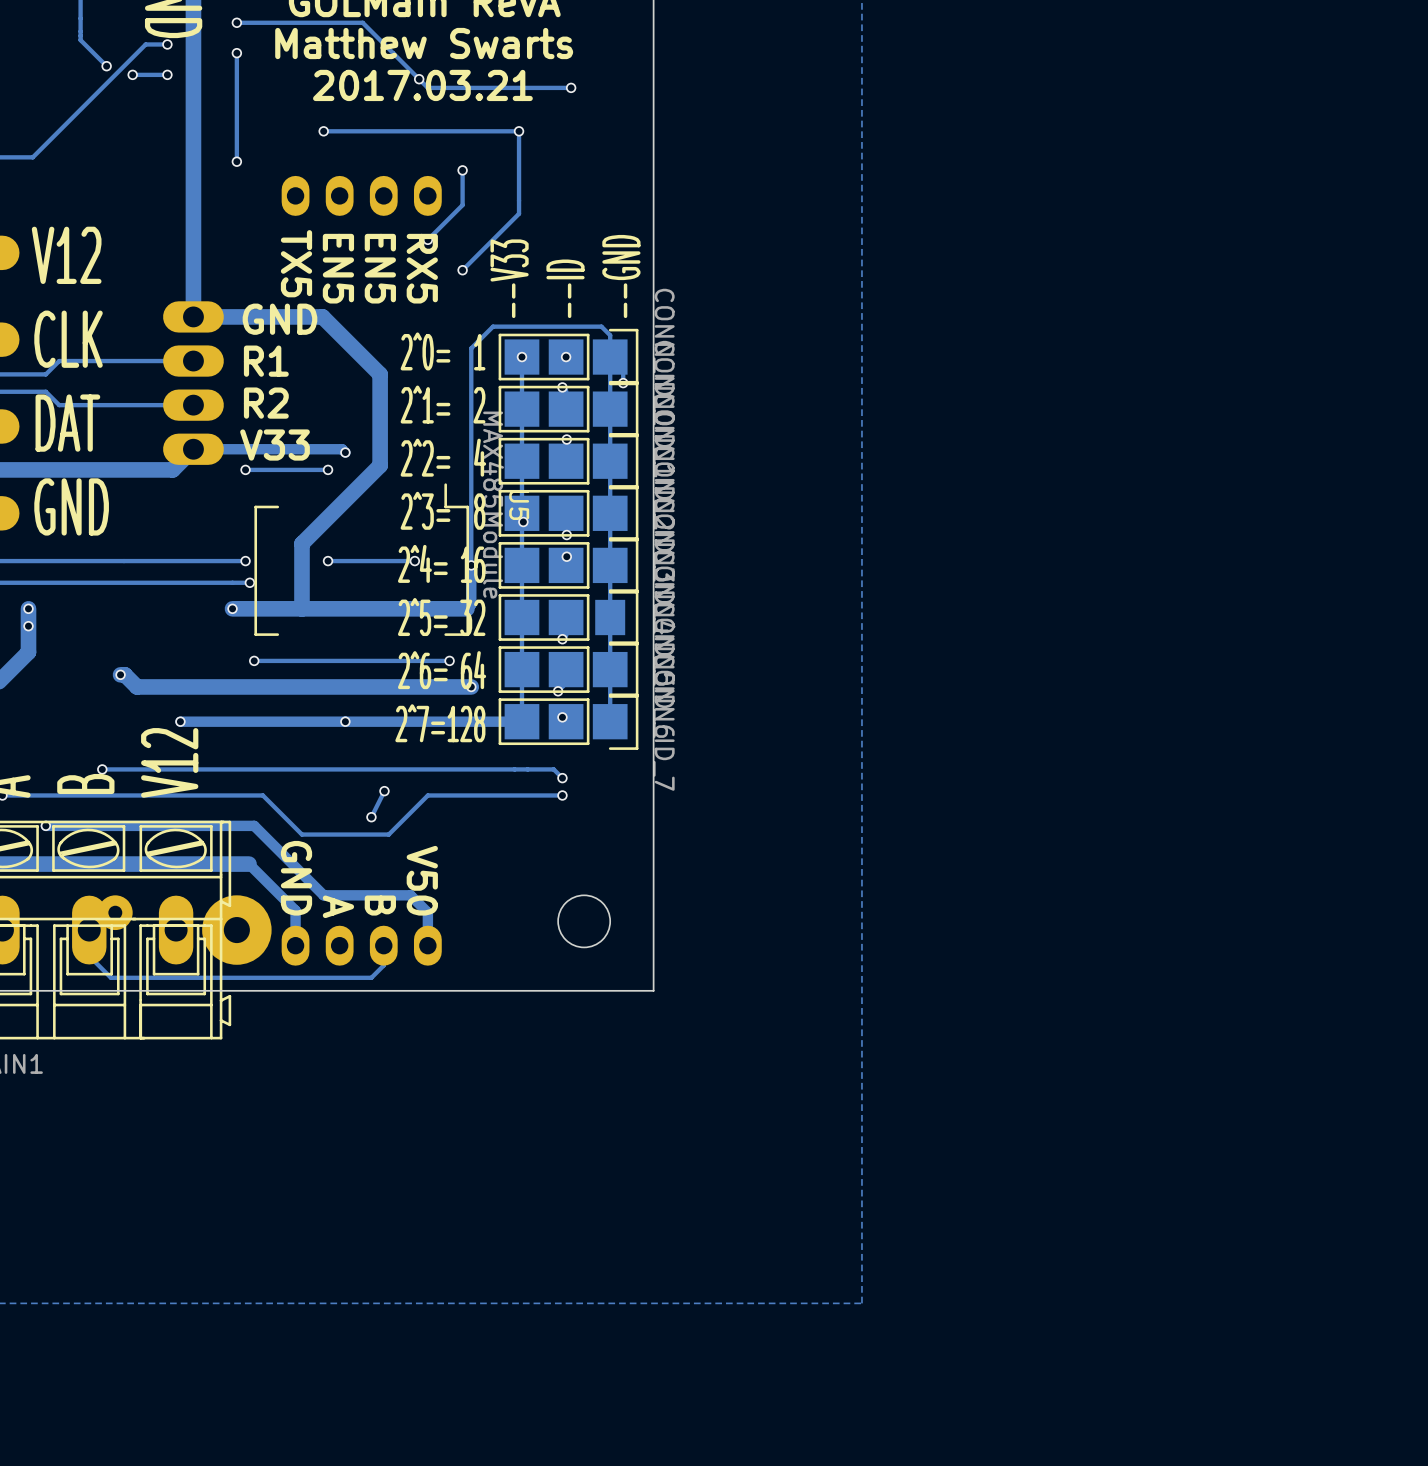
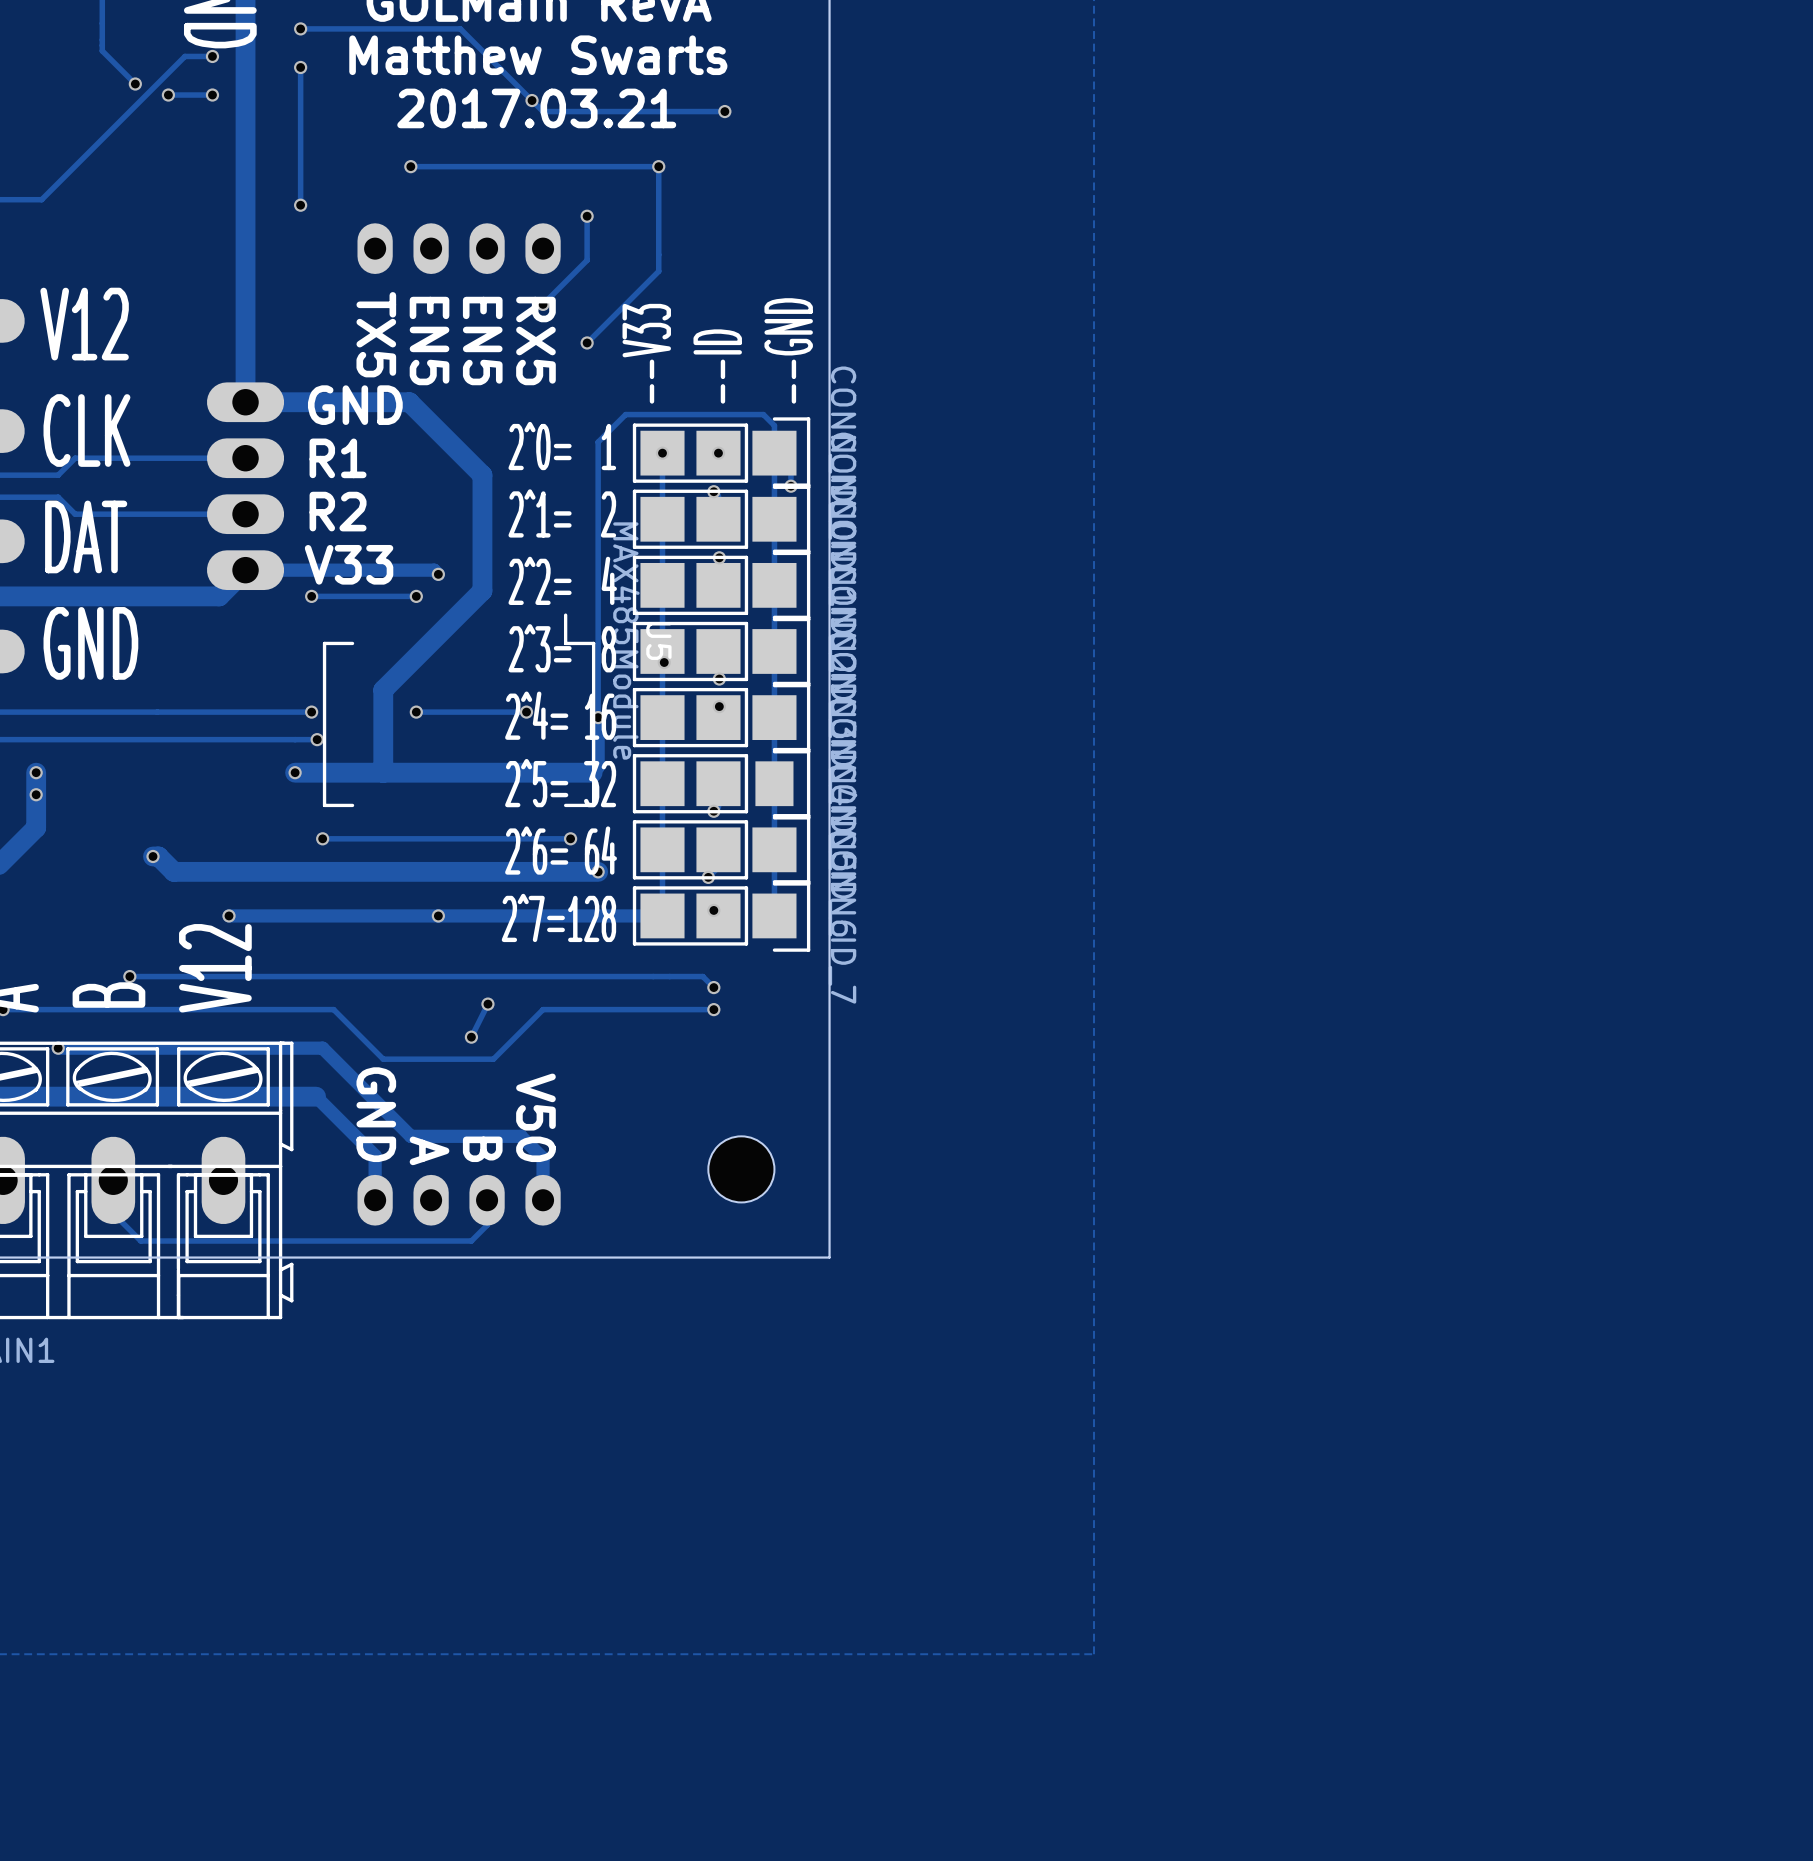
part: (115, 912) -> none
part: (236, 930) -> none

